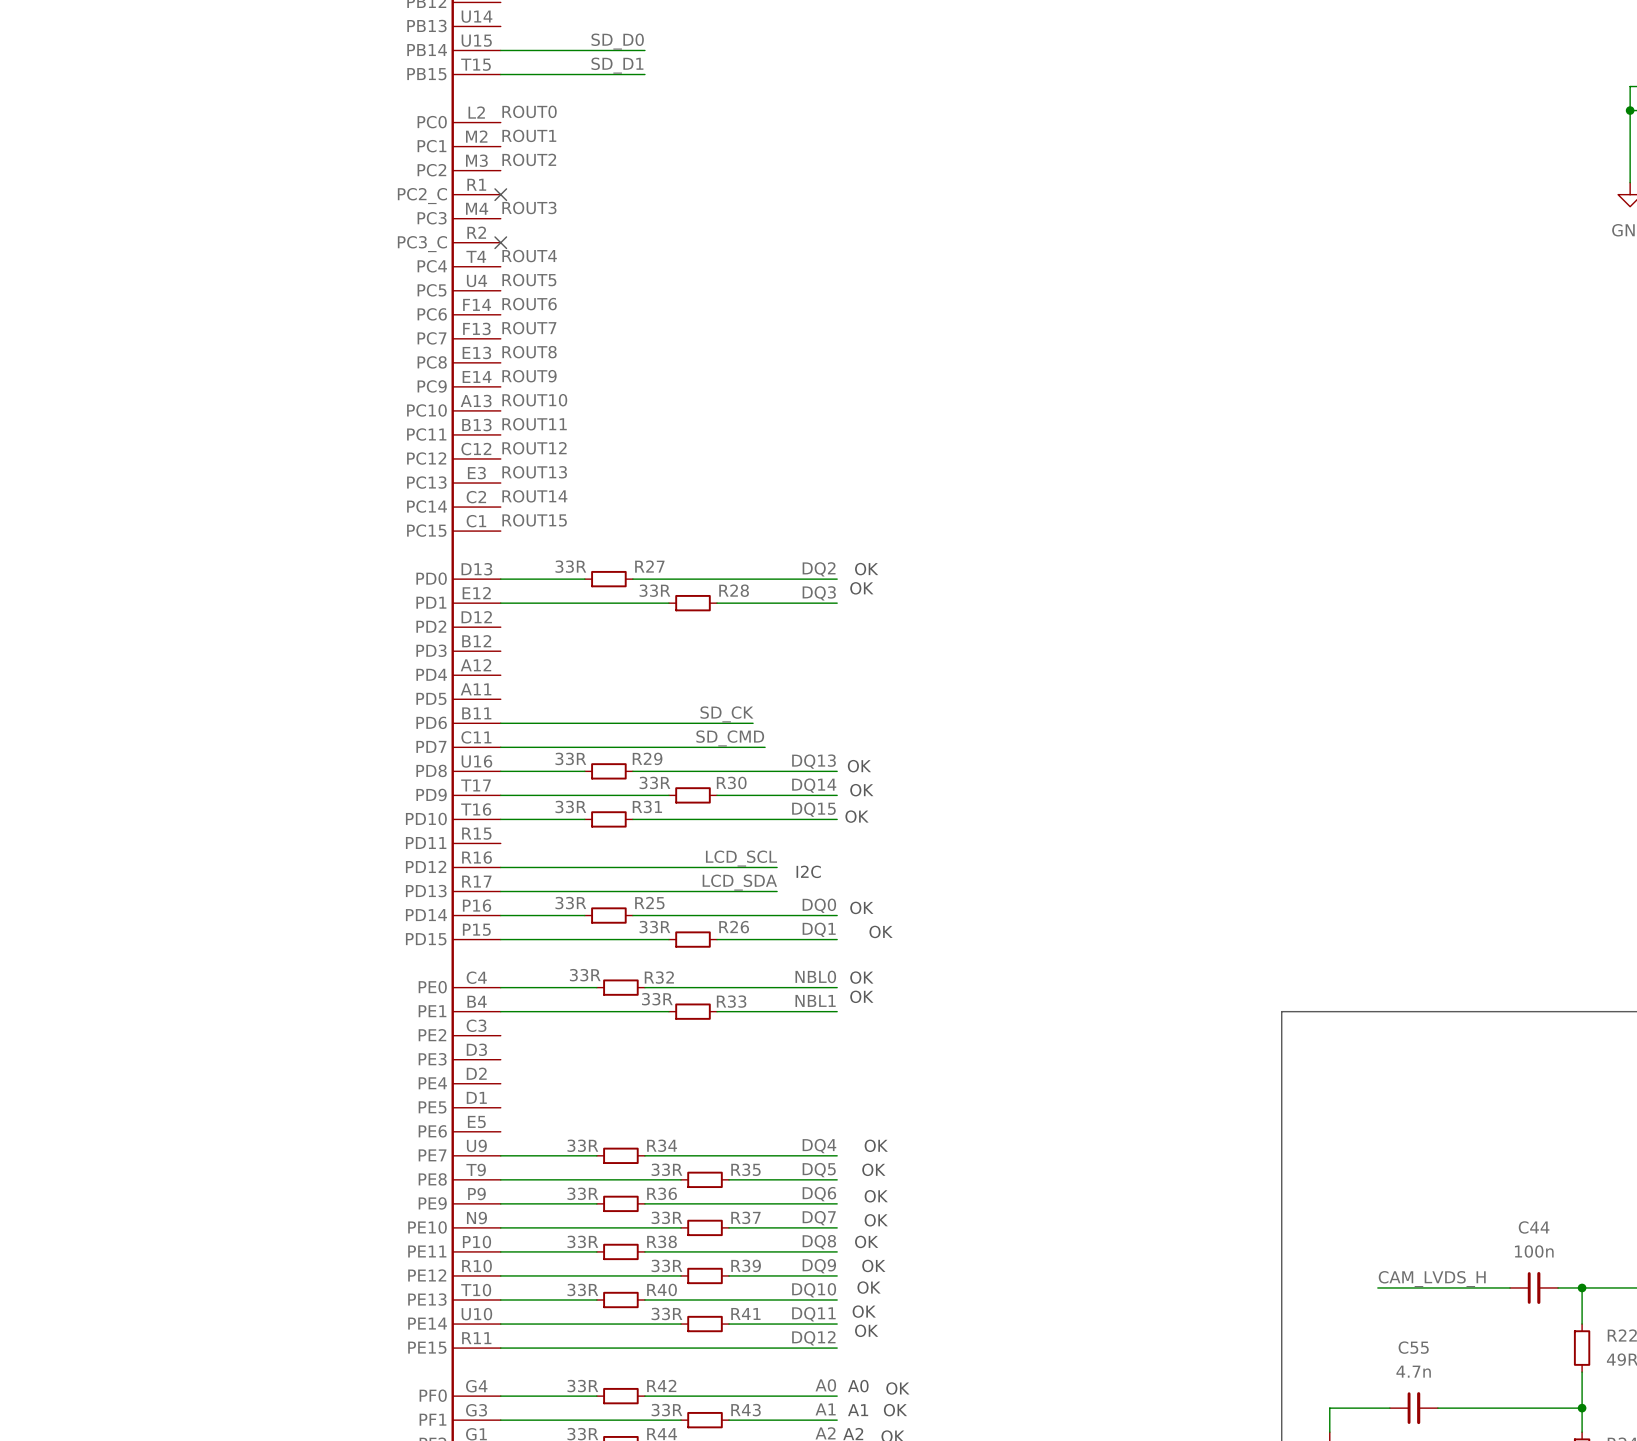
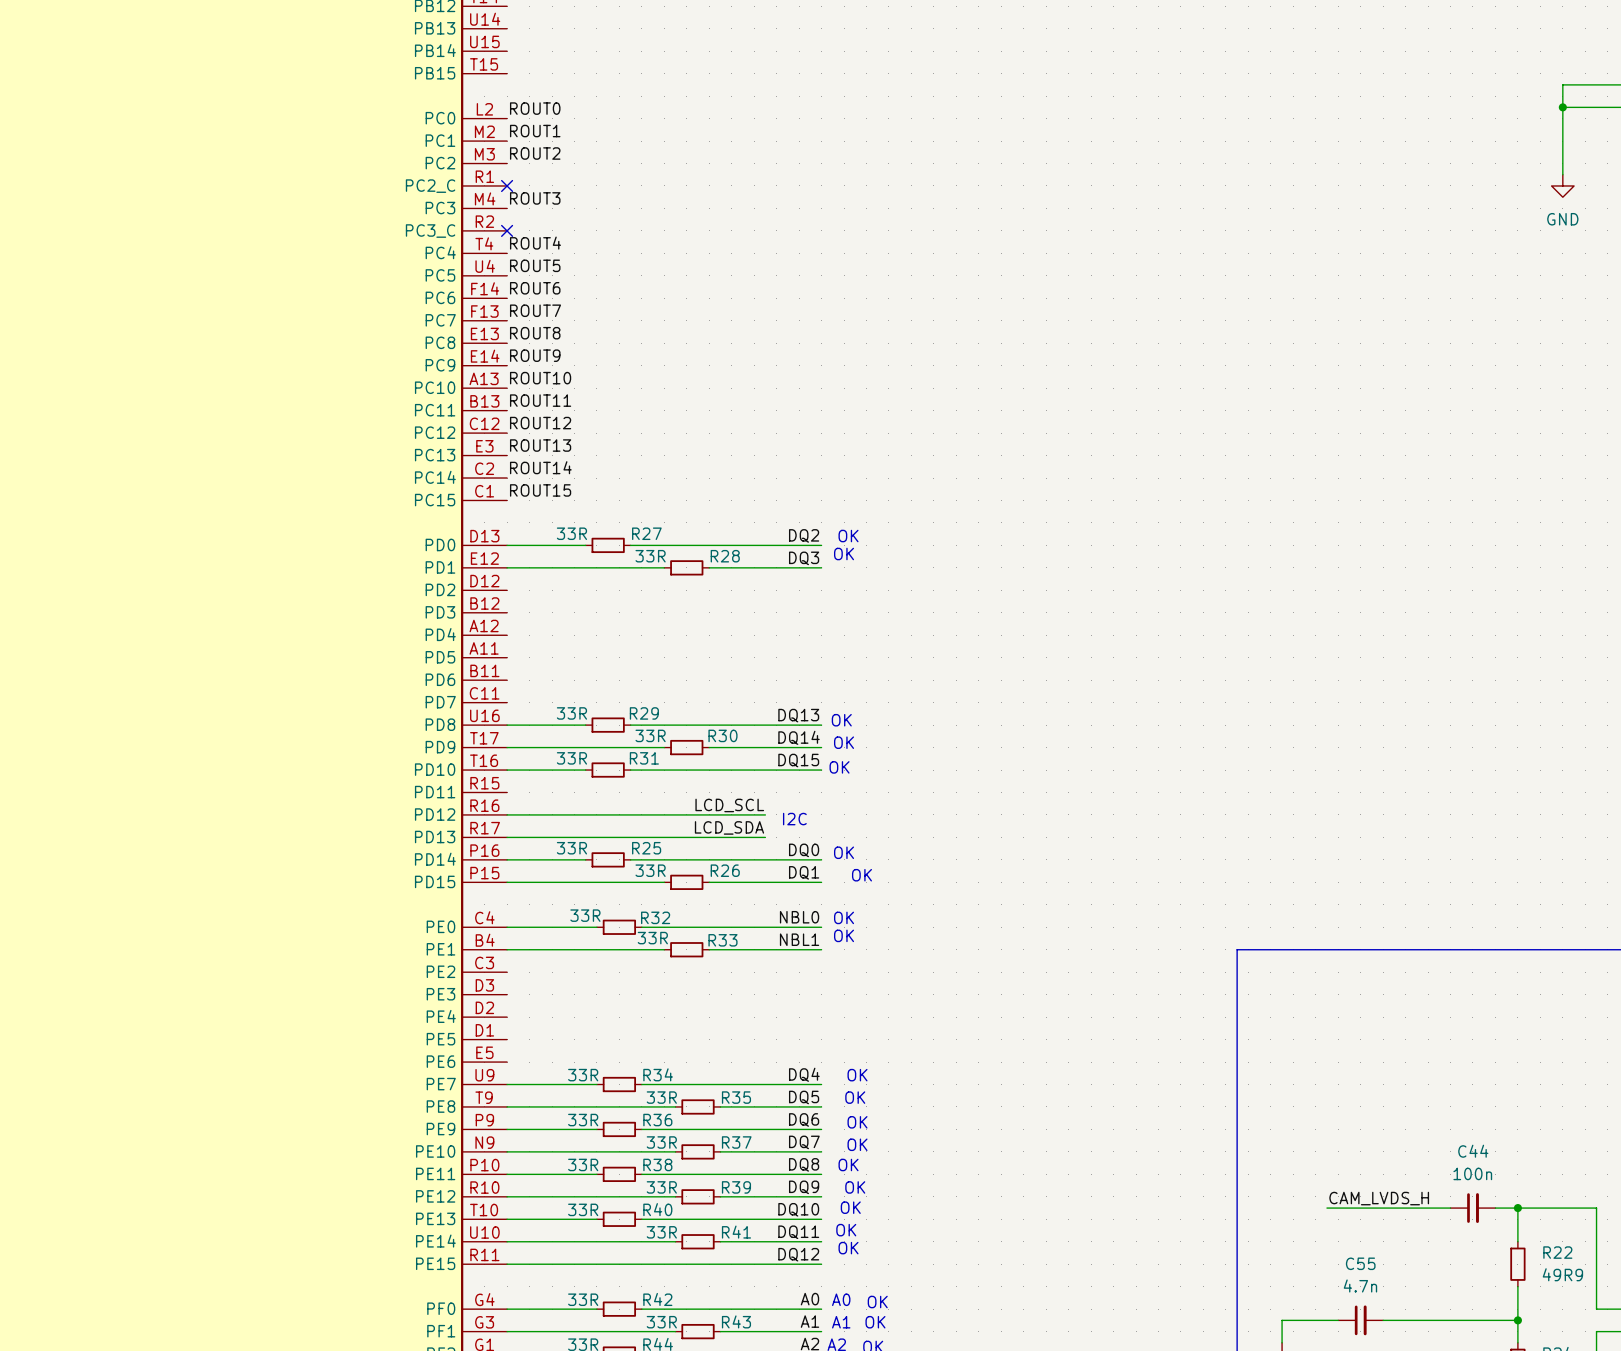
label: SD_D0 (617, 41) -> none
wire: (500, 50) (644, 50) -> none
label: SD_D1 (617, 65) -> none
wire: (500, 74) (644, 74) -> none
label: SD_CK (726, 714) -> none
wire: (500, 723) (753, 723) -> none
label: SD_CMD (730, 738) -> none
wire: (500, 747) (765, 747) -> none

